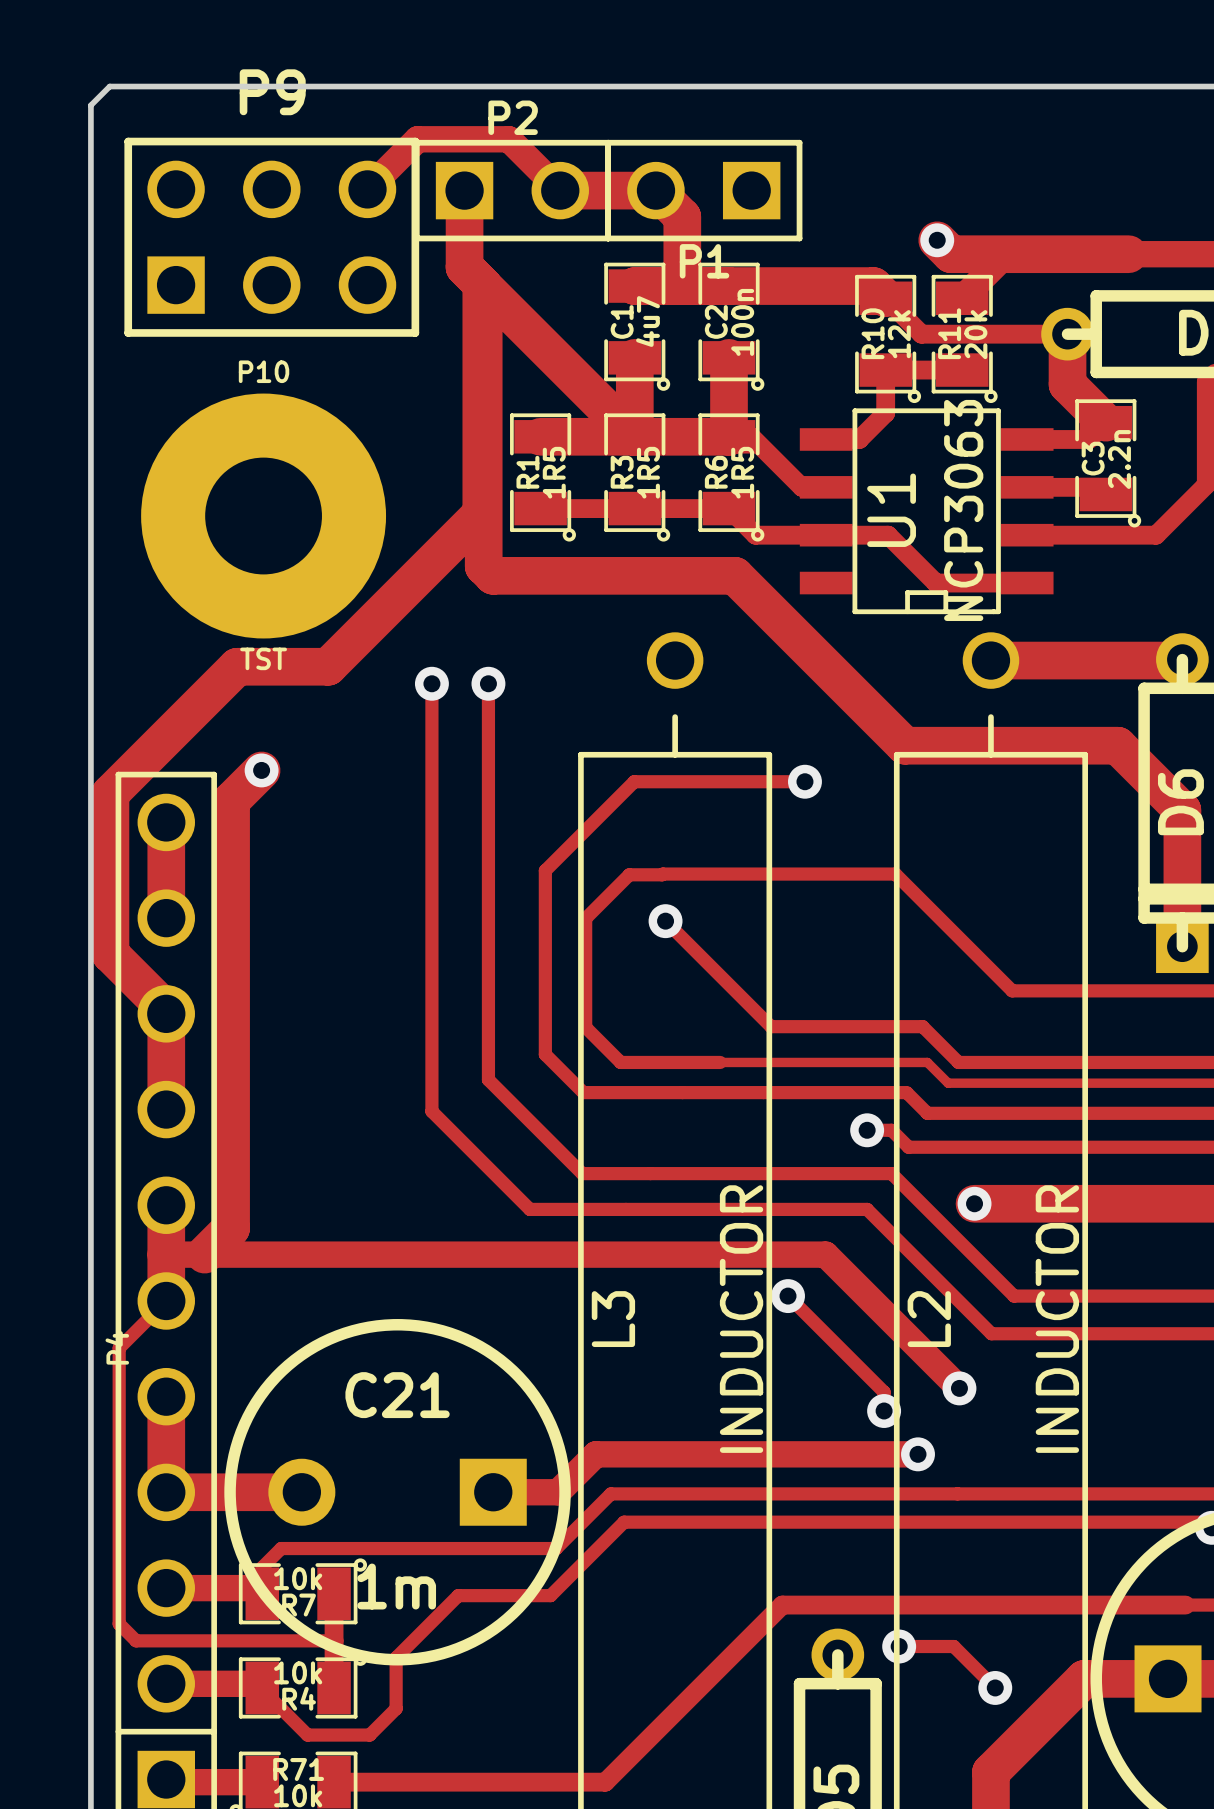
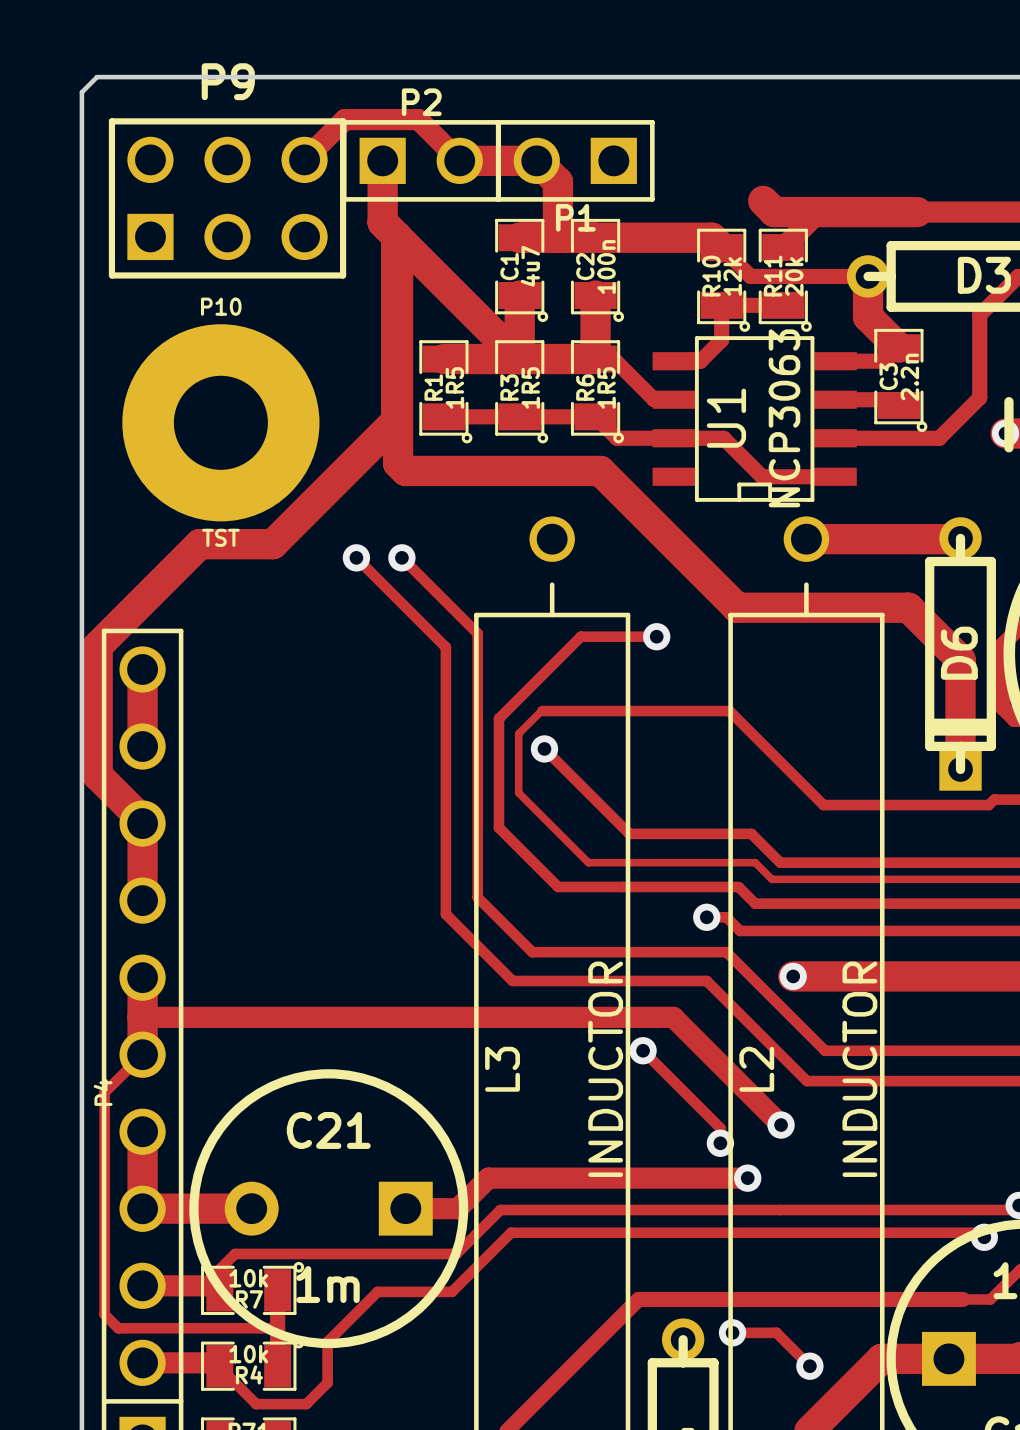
via: (937, 240) -> none
track: (431, 683) (431, 1111) (529, 1209) (625, 1209) -> (356, 557) (445, 647) (445, 914) (512, 980)
track: (488, 683) (488, 1079) (582, 1173) (650, 1173) -> (401, 557) (477, 633) (477, 897) (532, 952)
track: (261, 770) (231, 800) (231, 1228) (204, 1254) -> none
via: (261, 770) -> none
track: (710, 781) (634, 781) (545, 870) (545, 1054) (583, 1092) (682, 1092) -> (580, 636) (498, 718) (498, 827) (558, 886)
track: (662, 874) (629, 874) (585, 918) (585, 1027) (620, 1062) (720, 1062) -> (542, 711) (518, 733) (518, 792) (588, 862)

